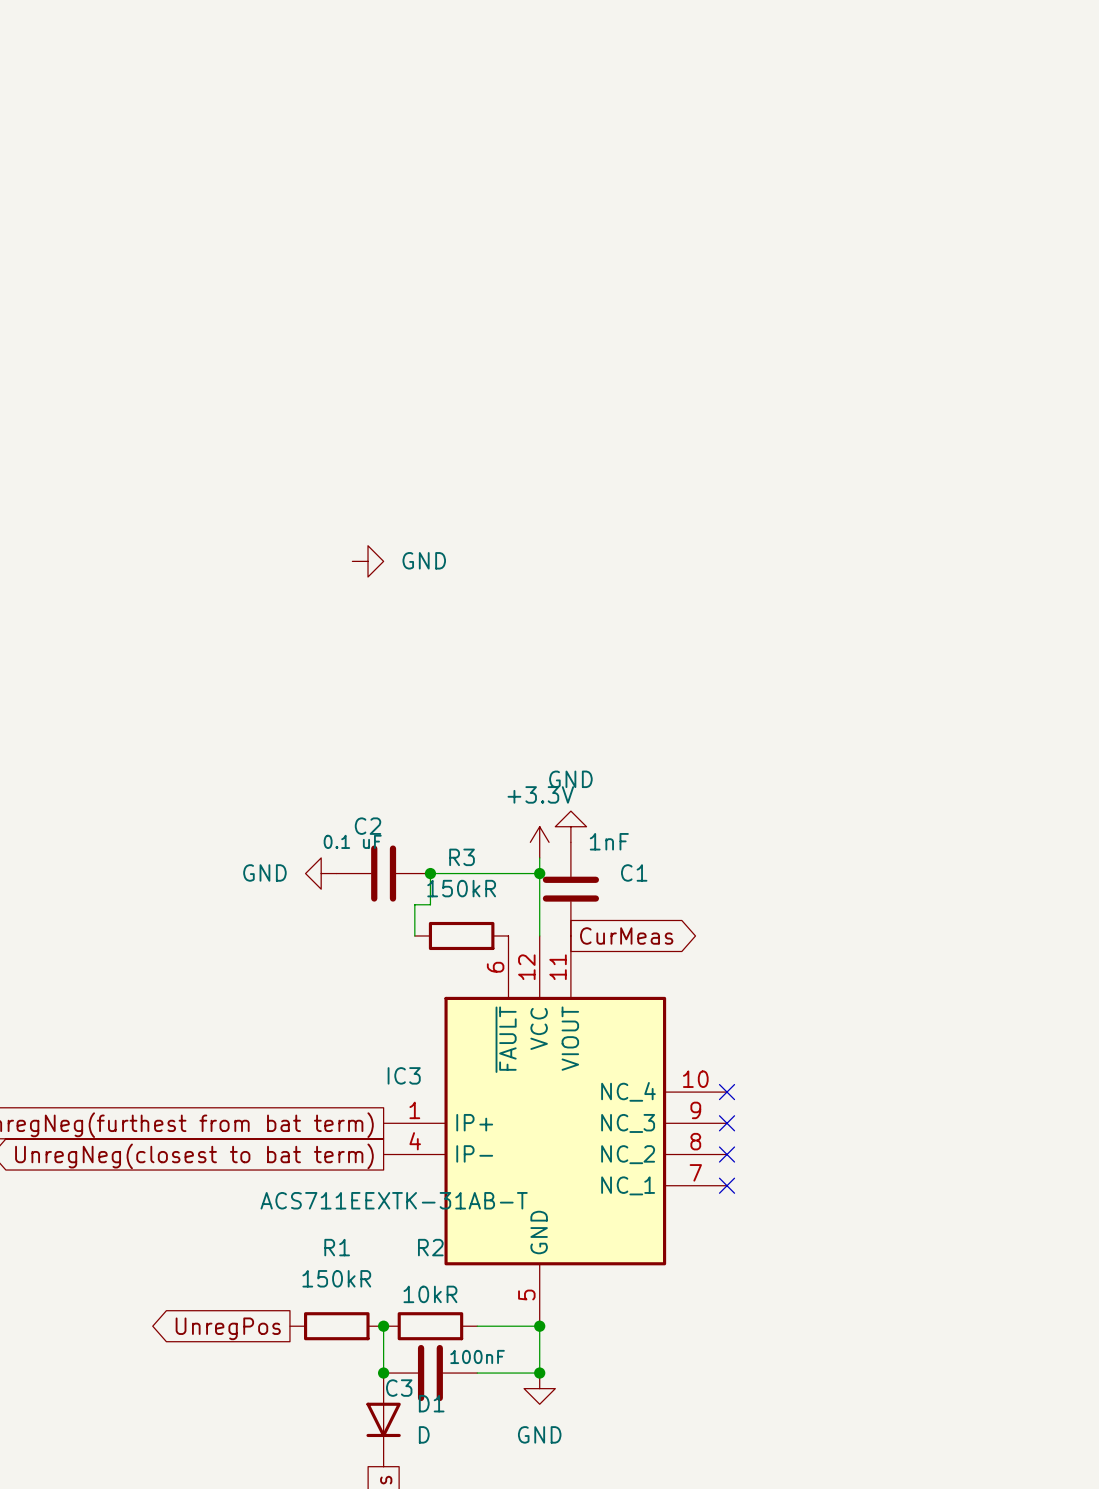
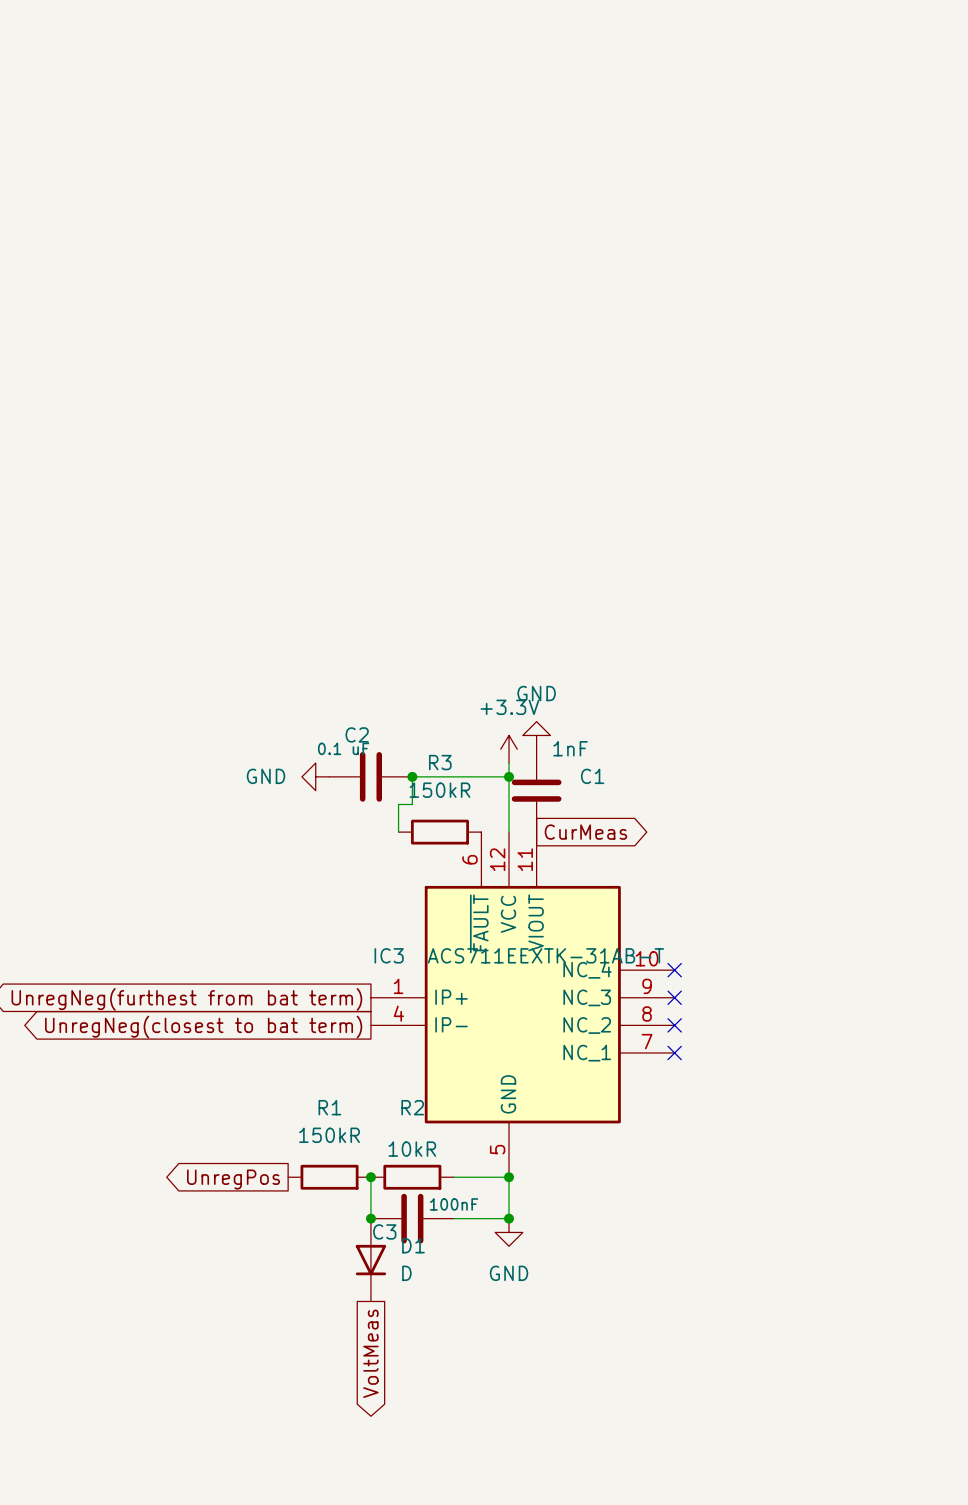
power symbol: GND (368, 561) -> none
IC3 value position: ACS711EEXTK-31AB-T (394, 1200) -> ACS711EEXTK-31AB-T (545, 955)

